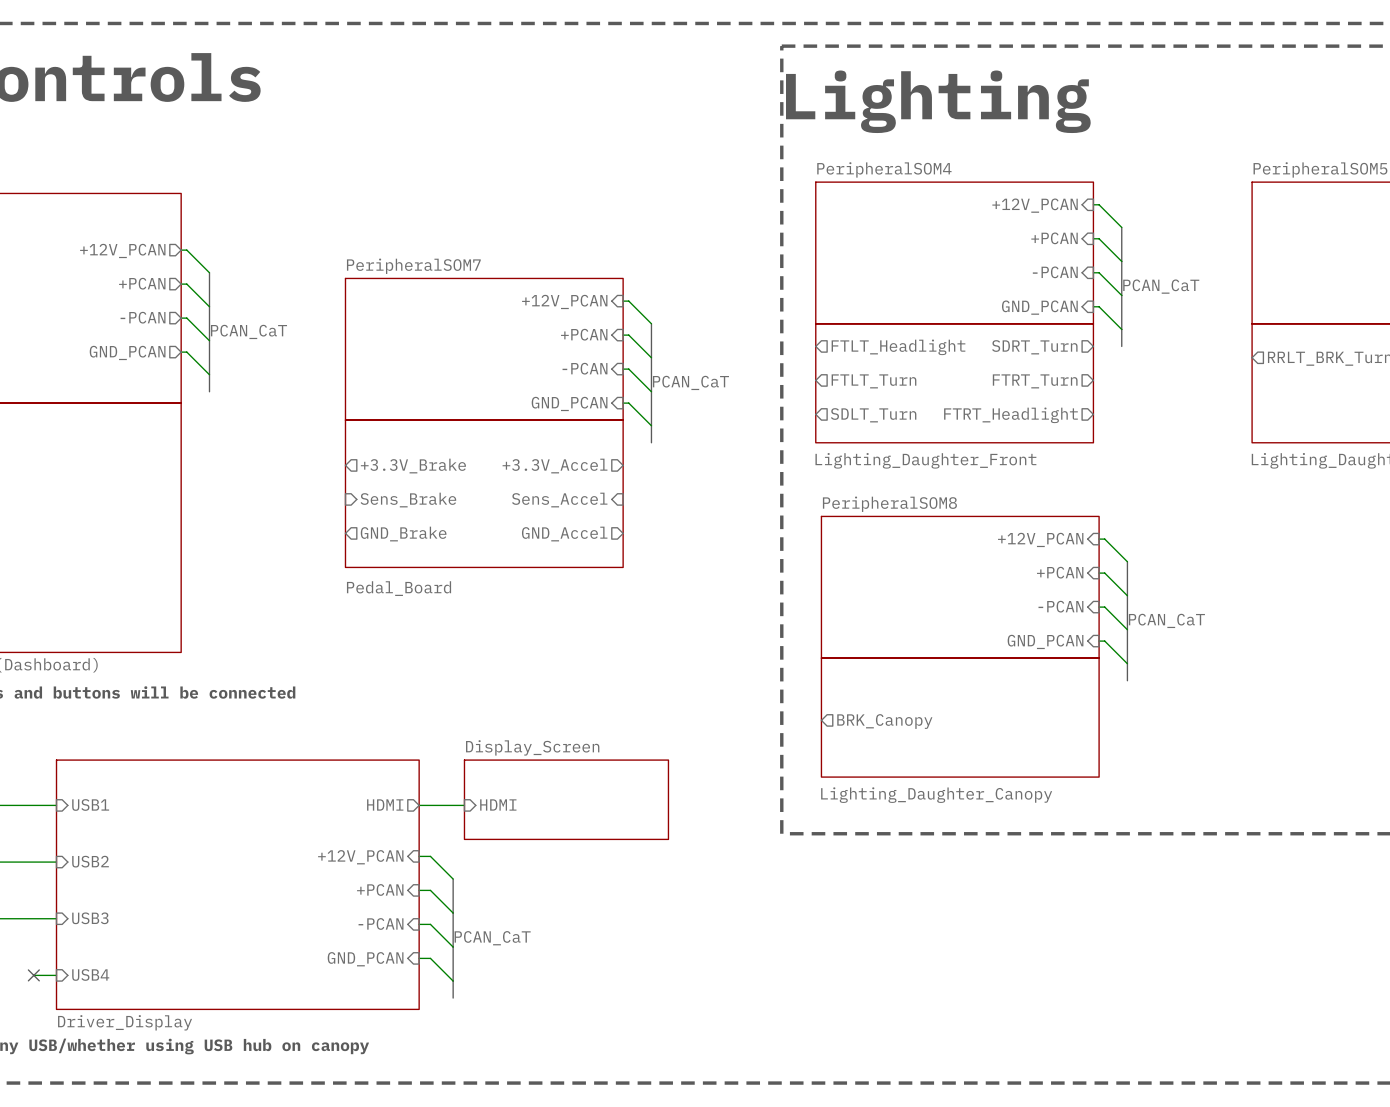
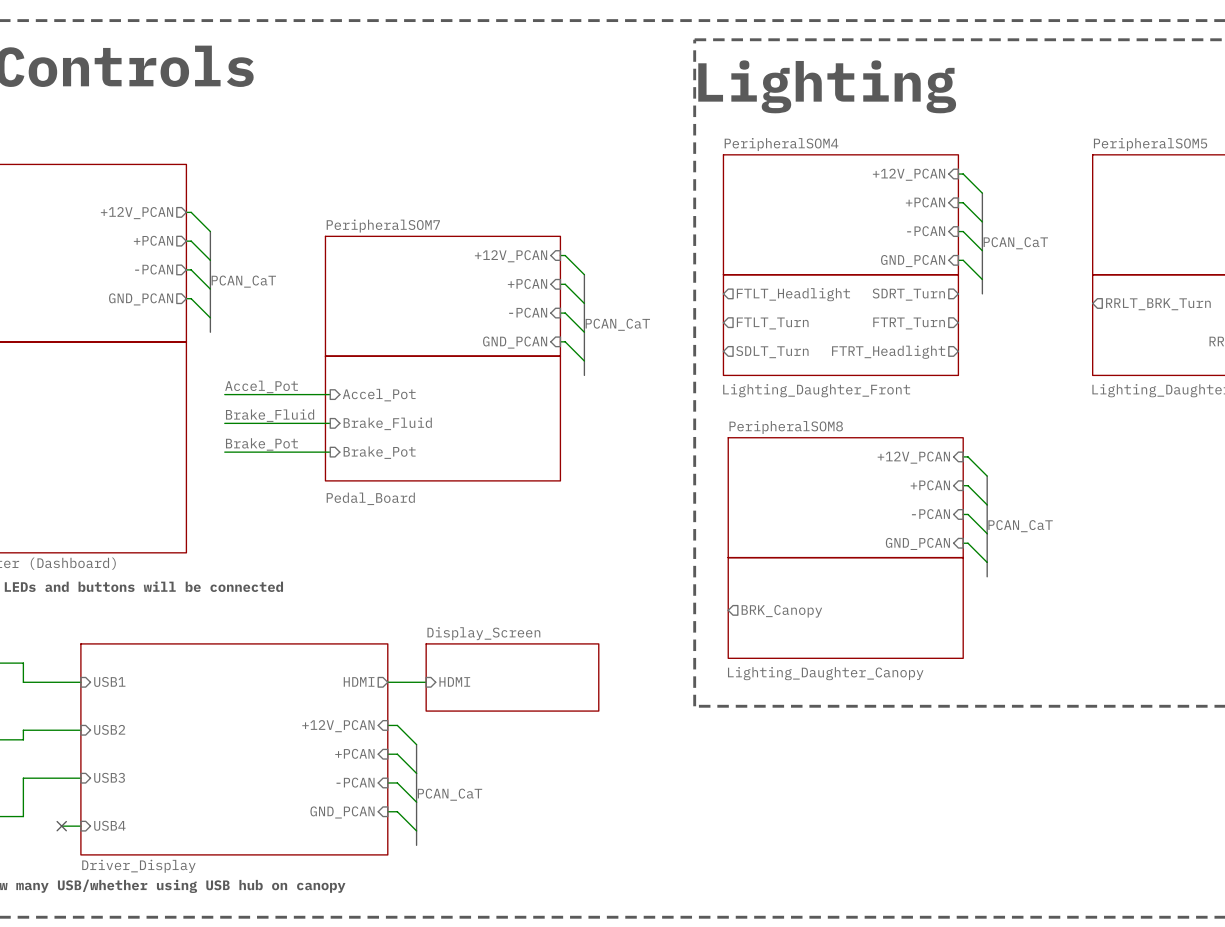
label: none -> Accel_Pot (261, 386)
wire: none -> (224, 394) (330, 394)
sheet pin shape: output (413, 466) -> input (379, 395)
sheet pin: +3.3V_Brake (413, 466) -> Accel_Pot (379, 395)
sheet pin: +3.3V_Accel (555, 466) -> none
label: none -> Brake_Fluid (270, 415)
wire: none -> (224, 423) (330, 423)
sheet pin: Sens_Brake (408, 500) -> Brake_Fluid (387, 423)
sheet pin: Sens_Accel (559, 500) -> none
label: none -> Brake_Pot (261, 444)
wire: none -> (224, 452) (330, 452)
sheet pin shape: output (403, 534) -> input (379, 452)
sheet pin: GND_Brake (403, 534) -> Brake_Pot (379, 452)
sheet pin: GND_Accel (564, 534) -> none

